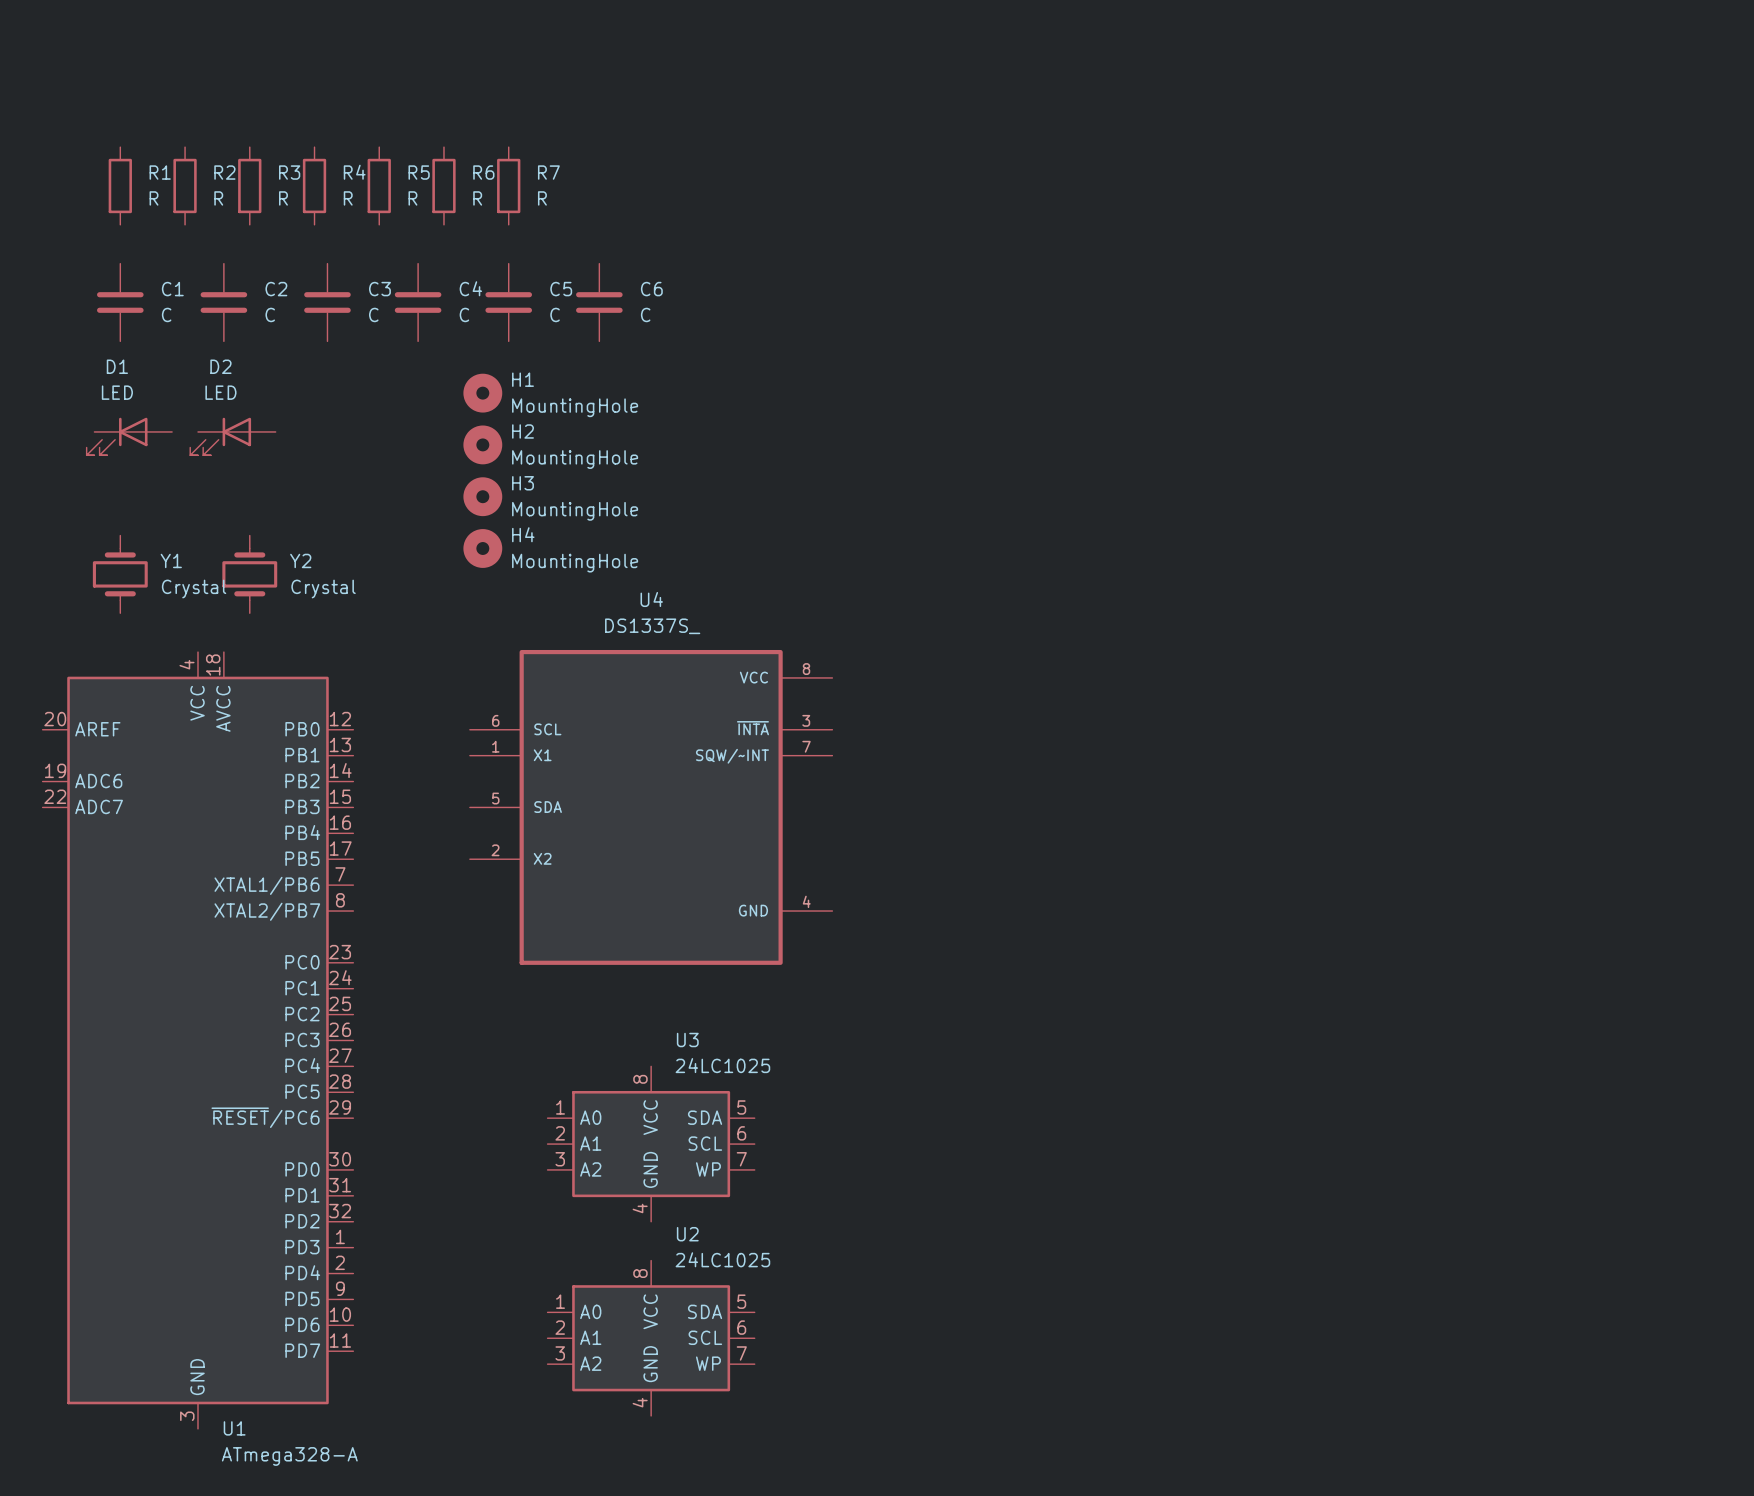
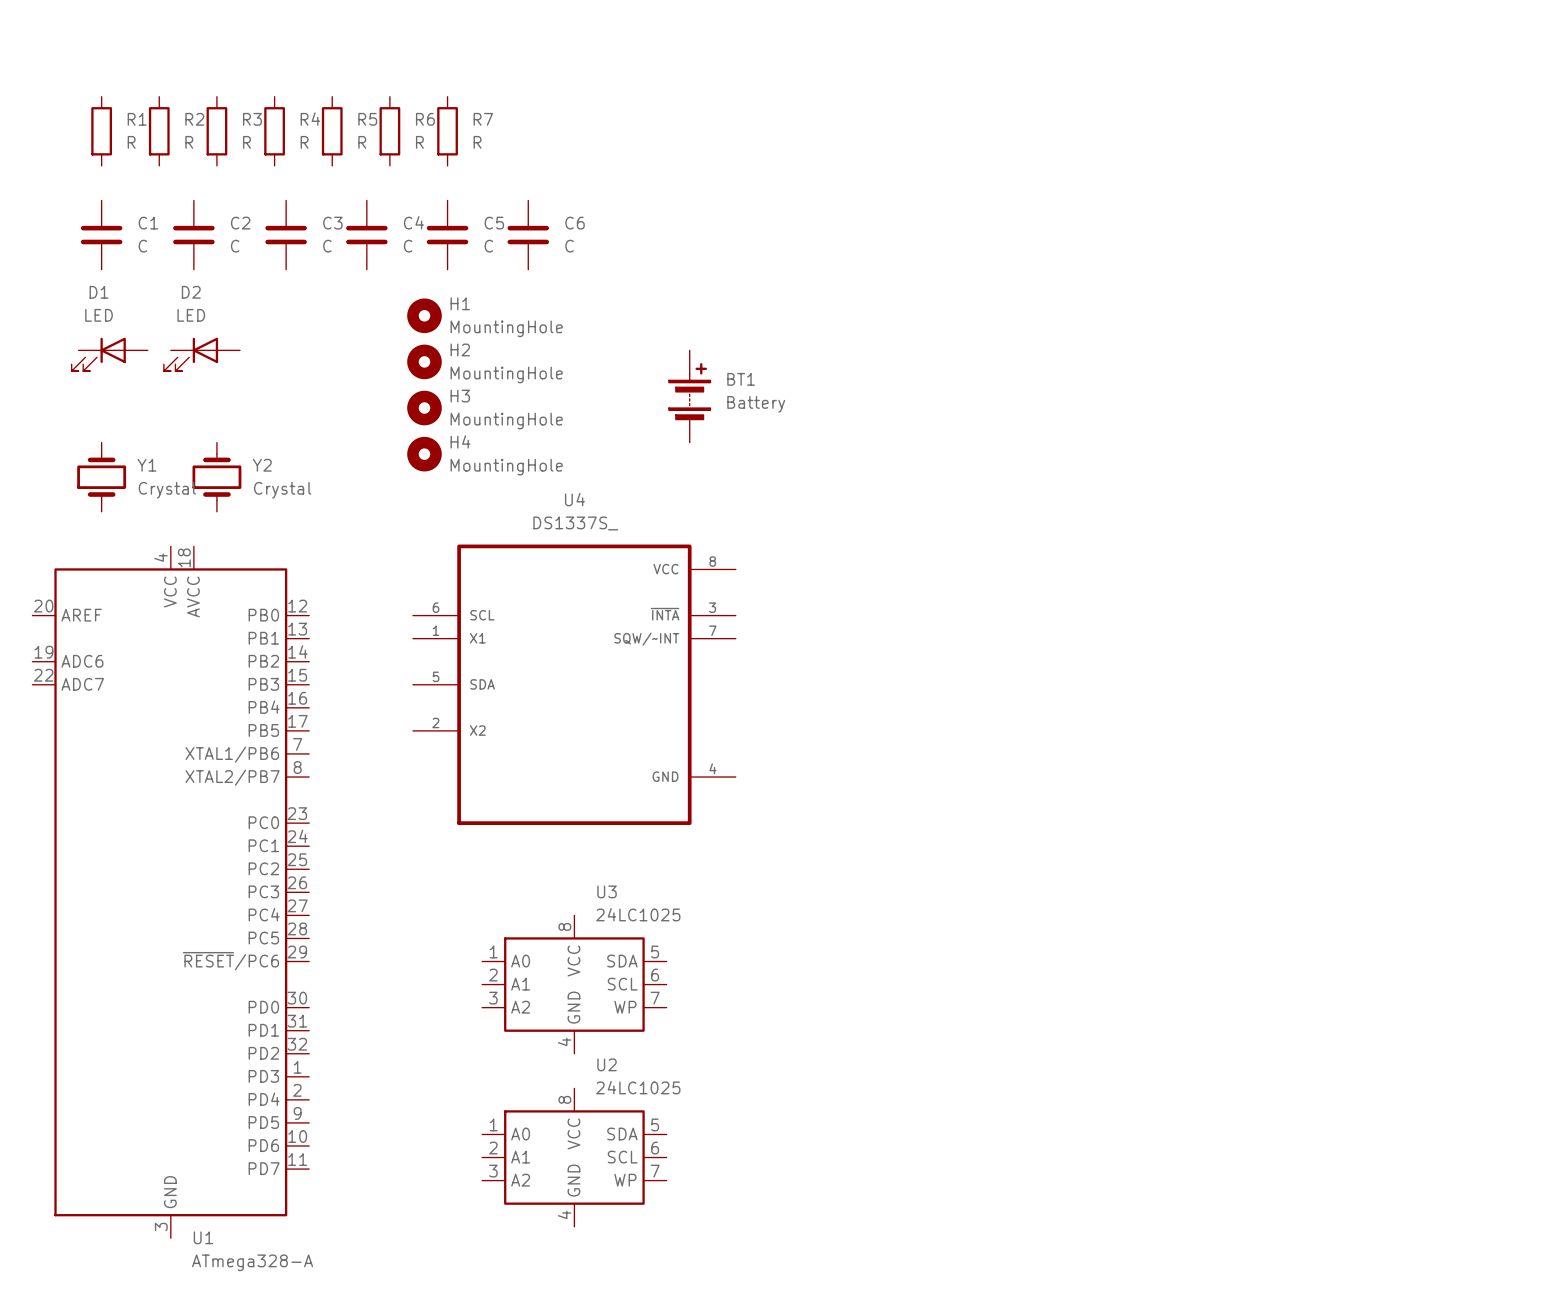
BT1: none -> Battery (689, 396)

